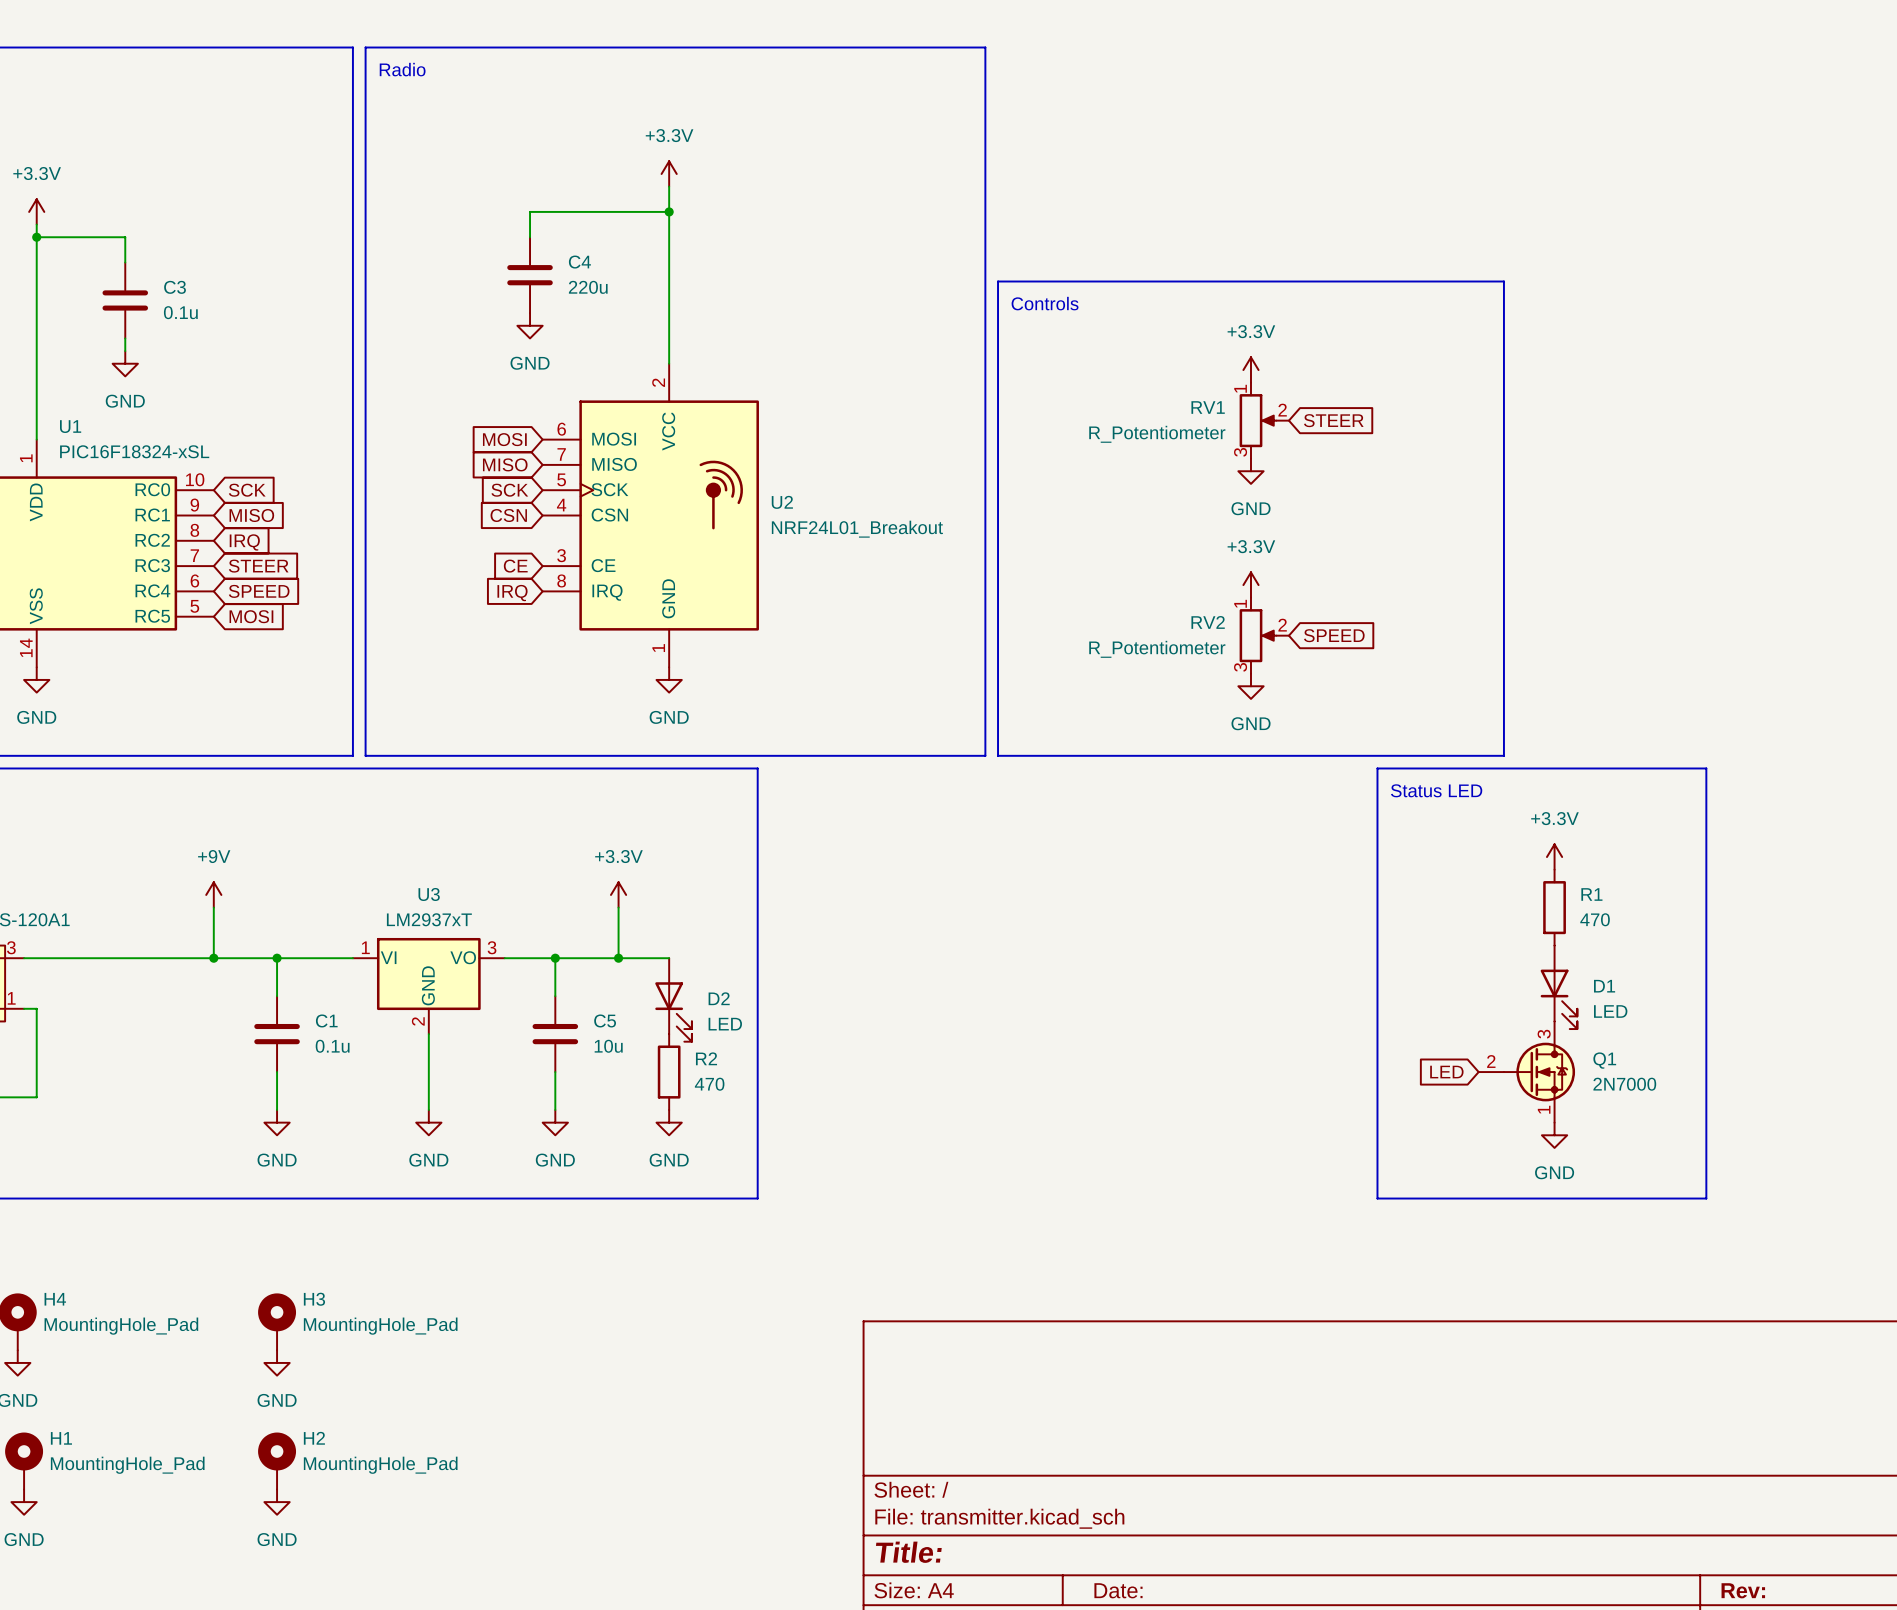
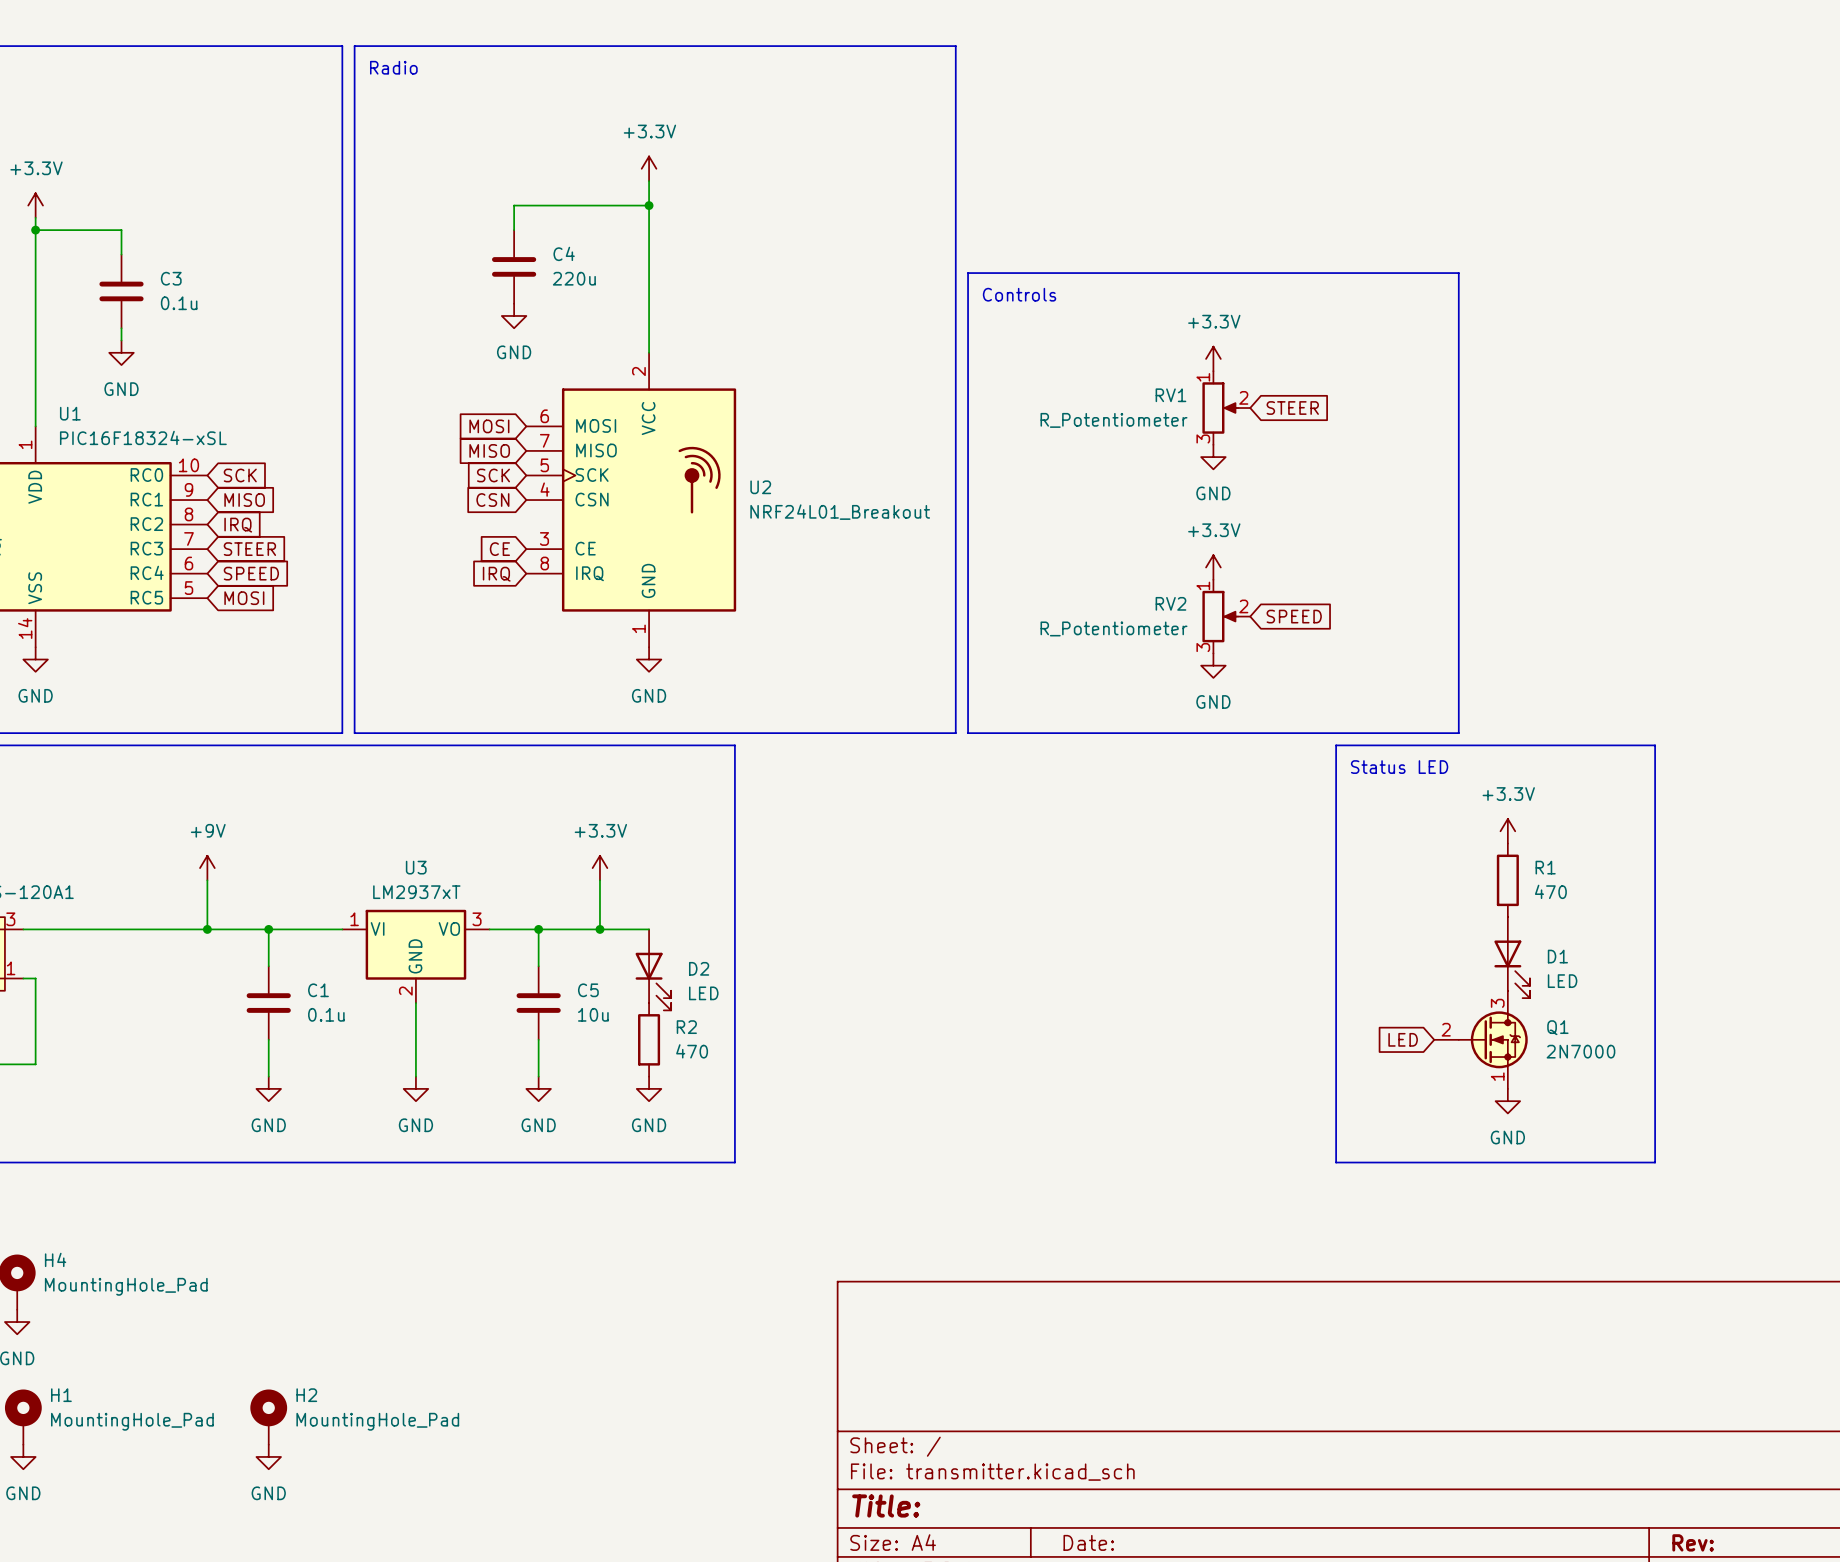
H3: MountingHole_Pad (277, 1321) -> none
power symbol: GND (277, 1362) -> none

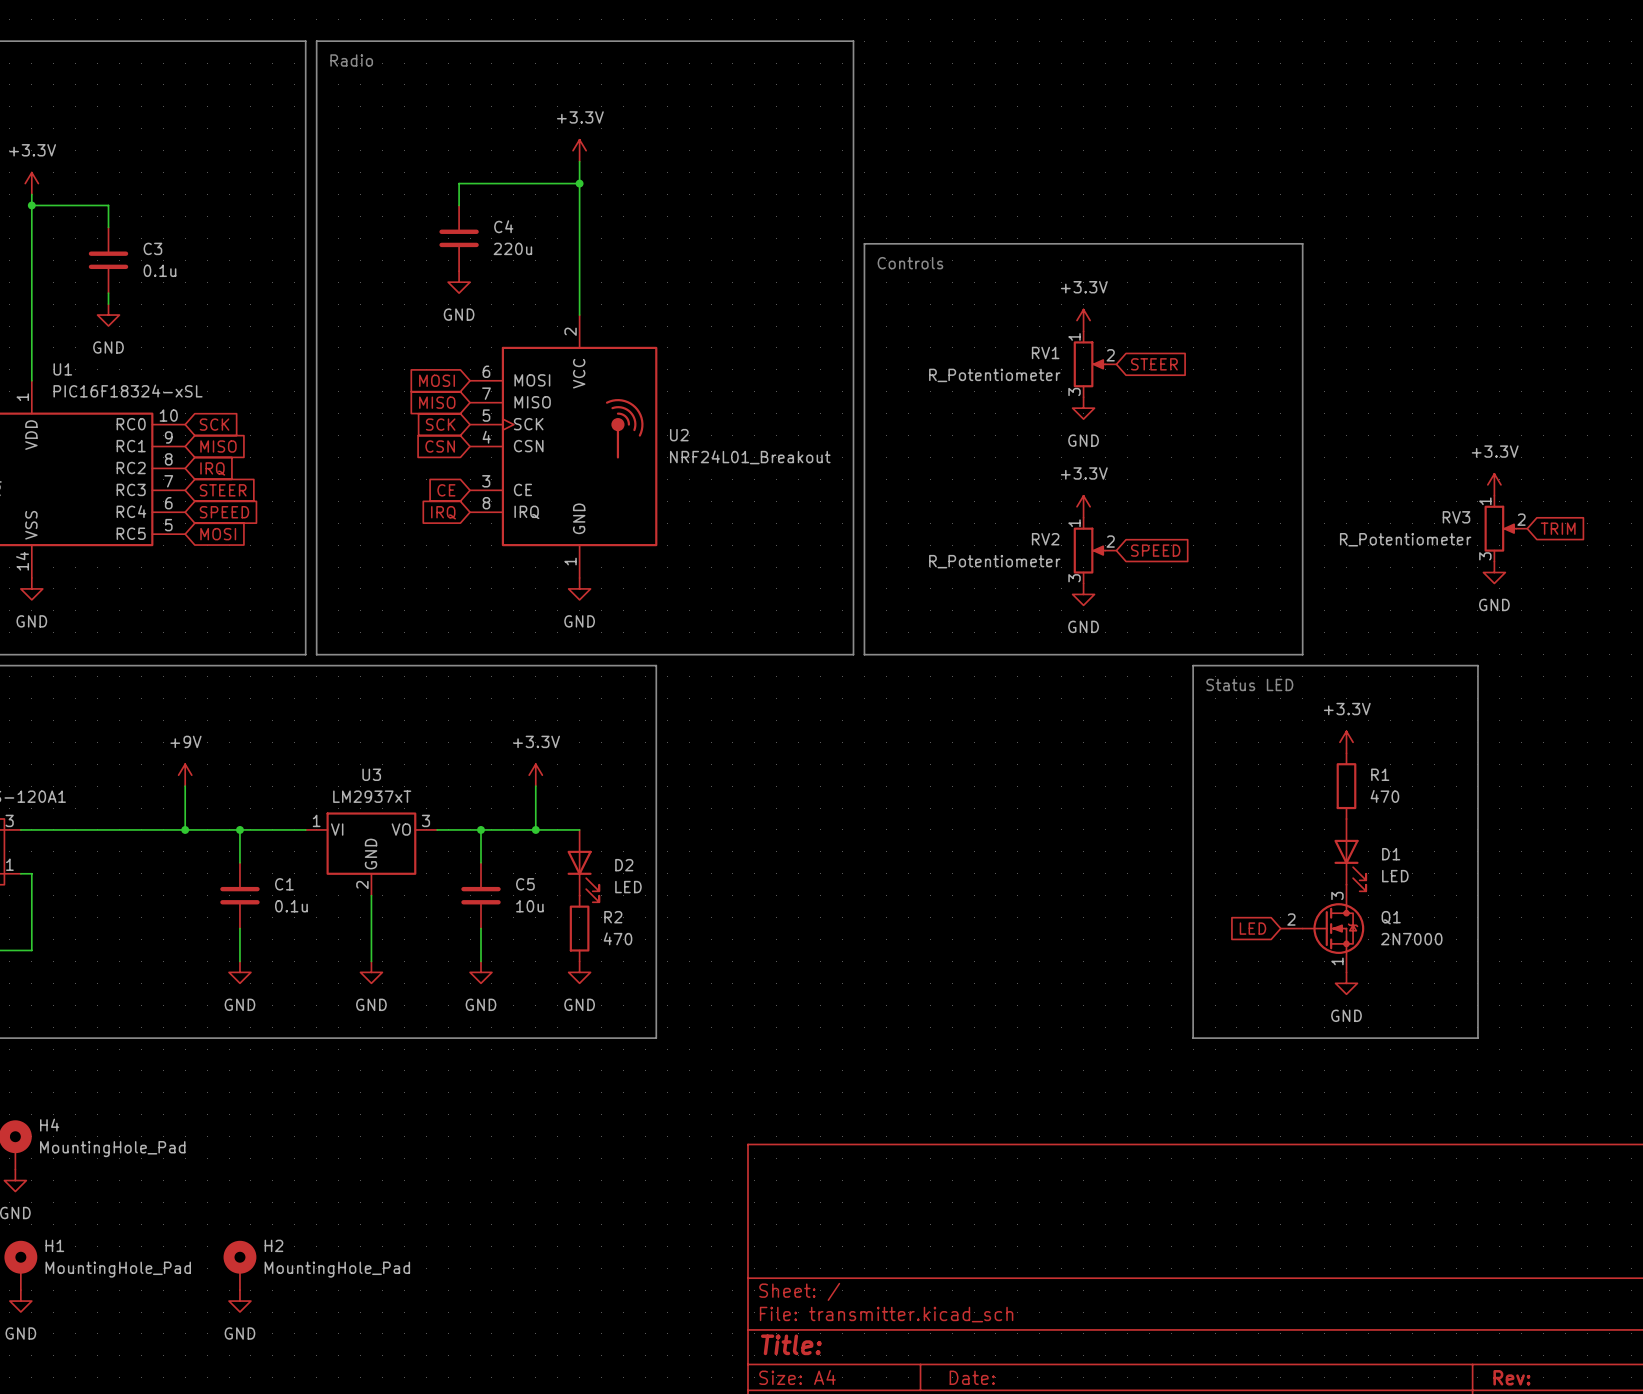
power symbol: none -> +3.3V (1494, 484)
RV3: none -> R_Potentiometer (1505, 528)
global label: none -> TRIM (1558, 528)
power symbol: none -> GND (1494, 572)

